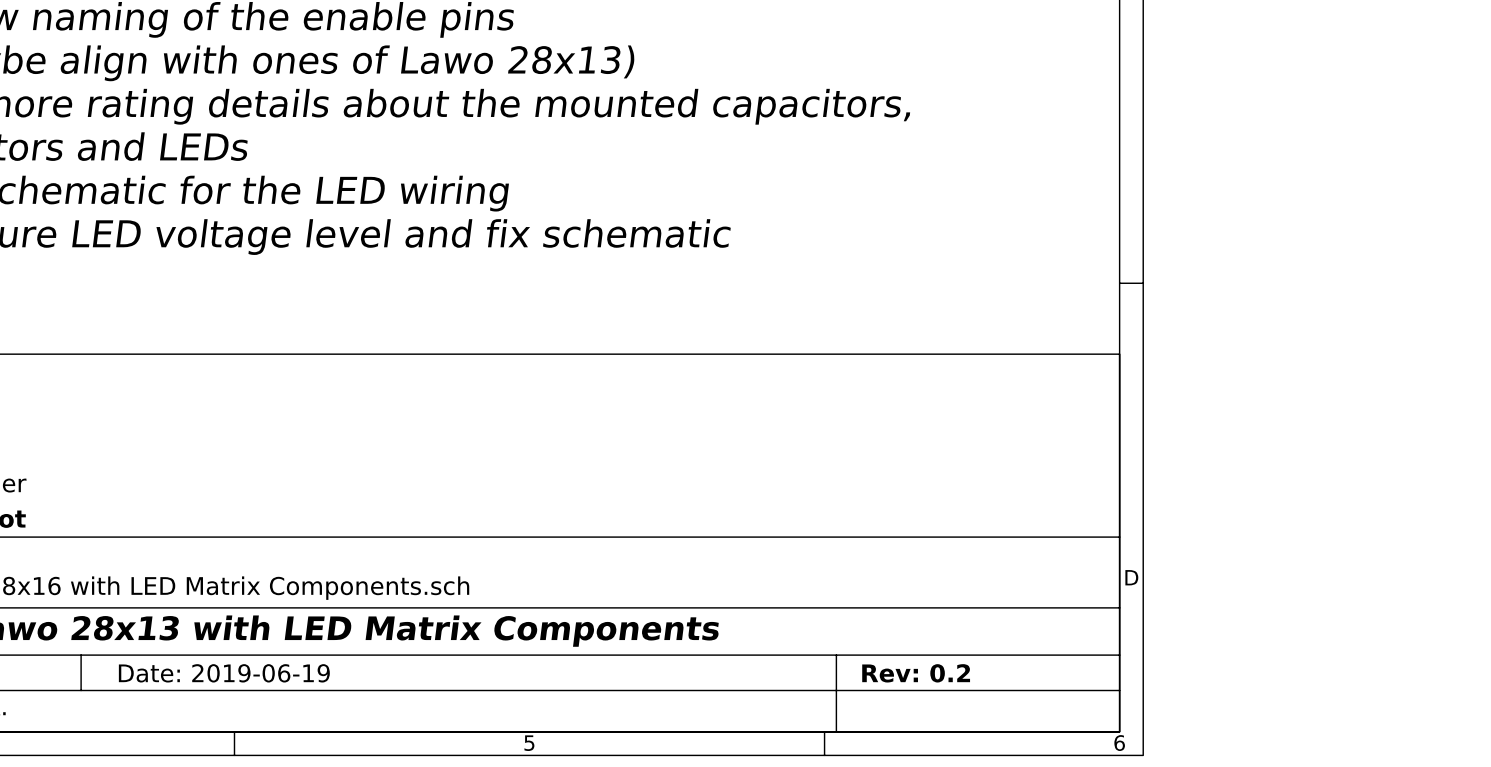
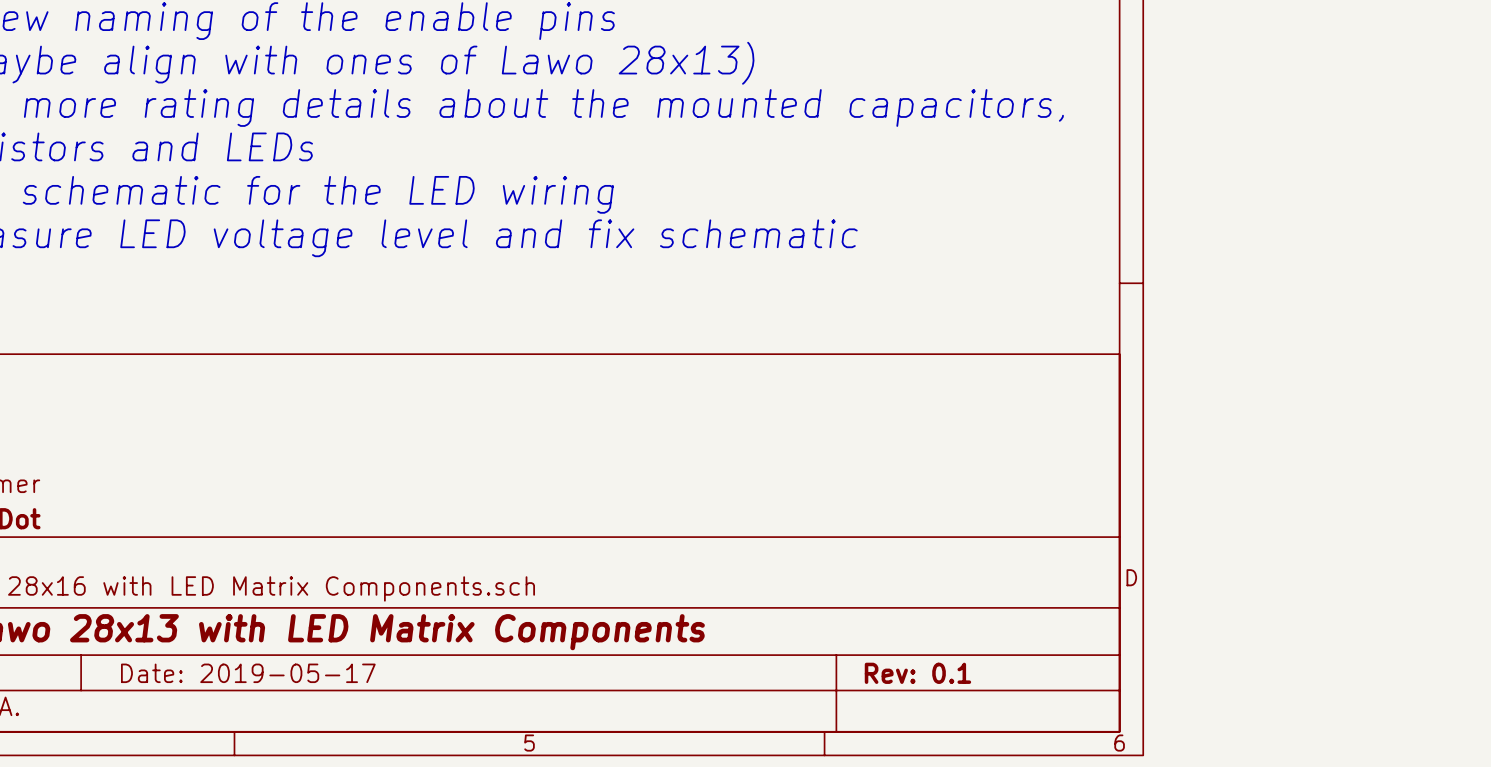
title block: Date: 2019-06-19 (224, 673) -> Date: 2019-05-17 (248, 673)
title block: Rev: 0.2 (916, 673) -> Rev: 0.1 (917, 673)

